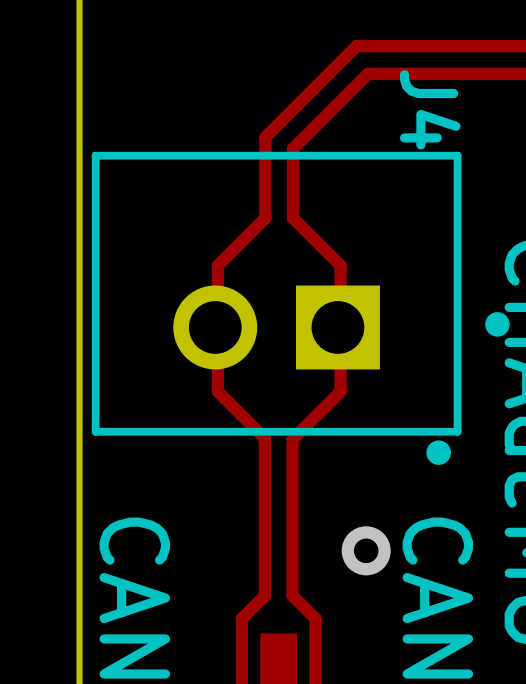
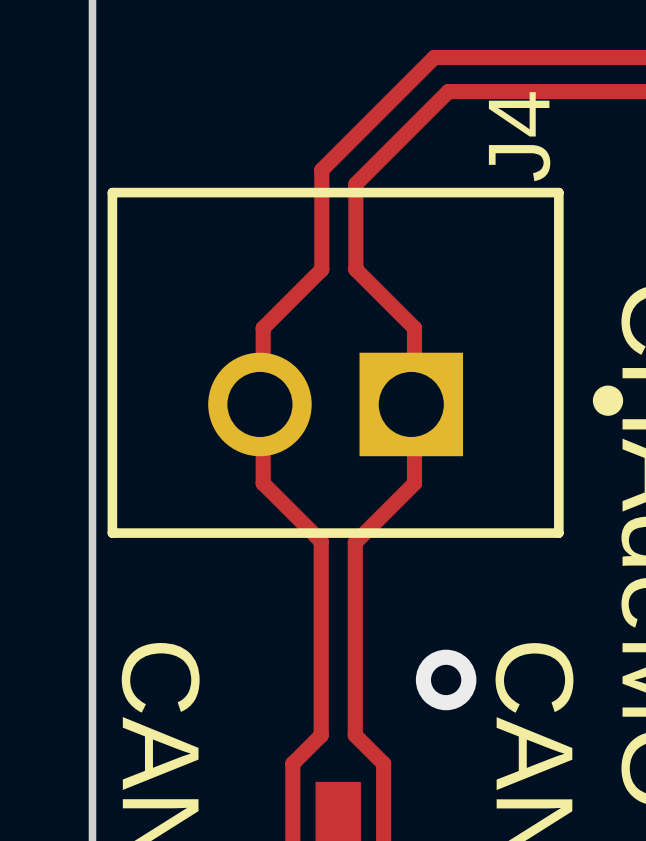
J4 name rotation: 0° (430, 109) -> 180° (519, 136)
J4 footprint: [91, 151, 510, 465] -> [107, 187, 624, 538]

